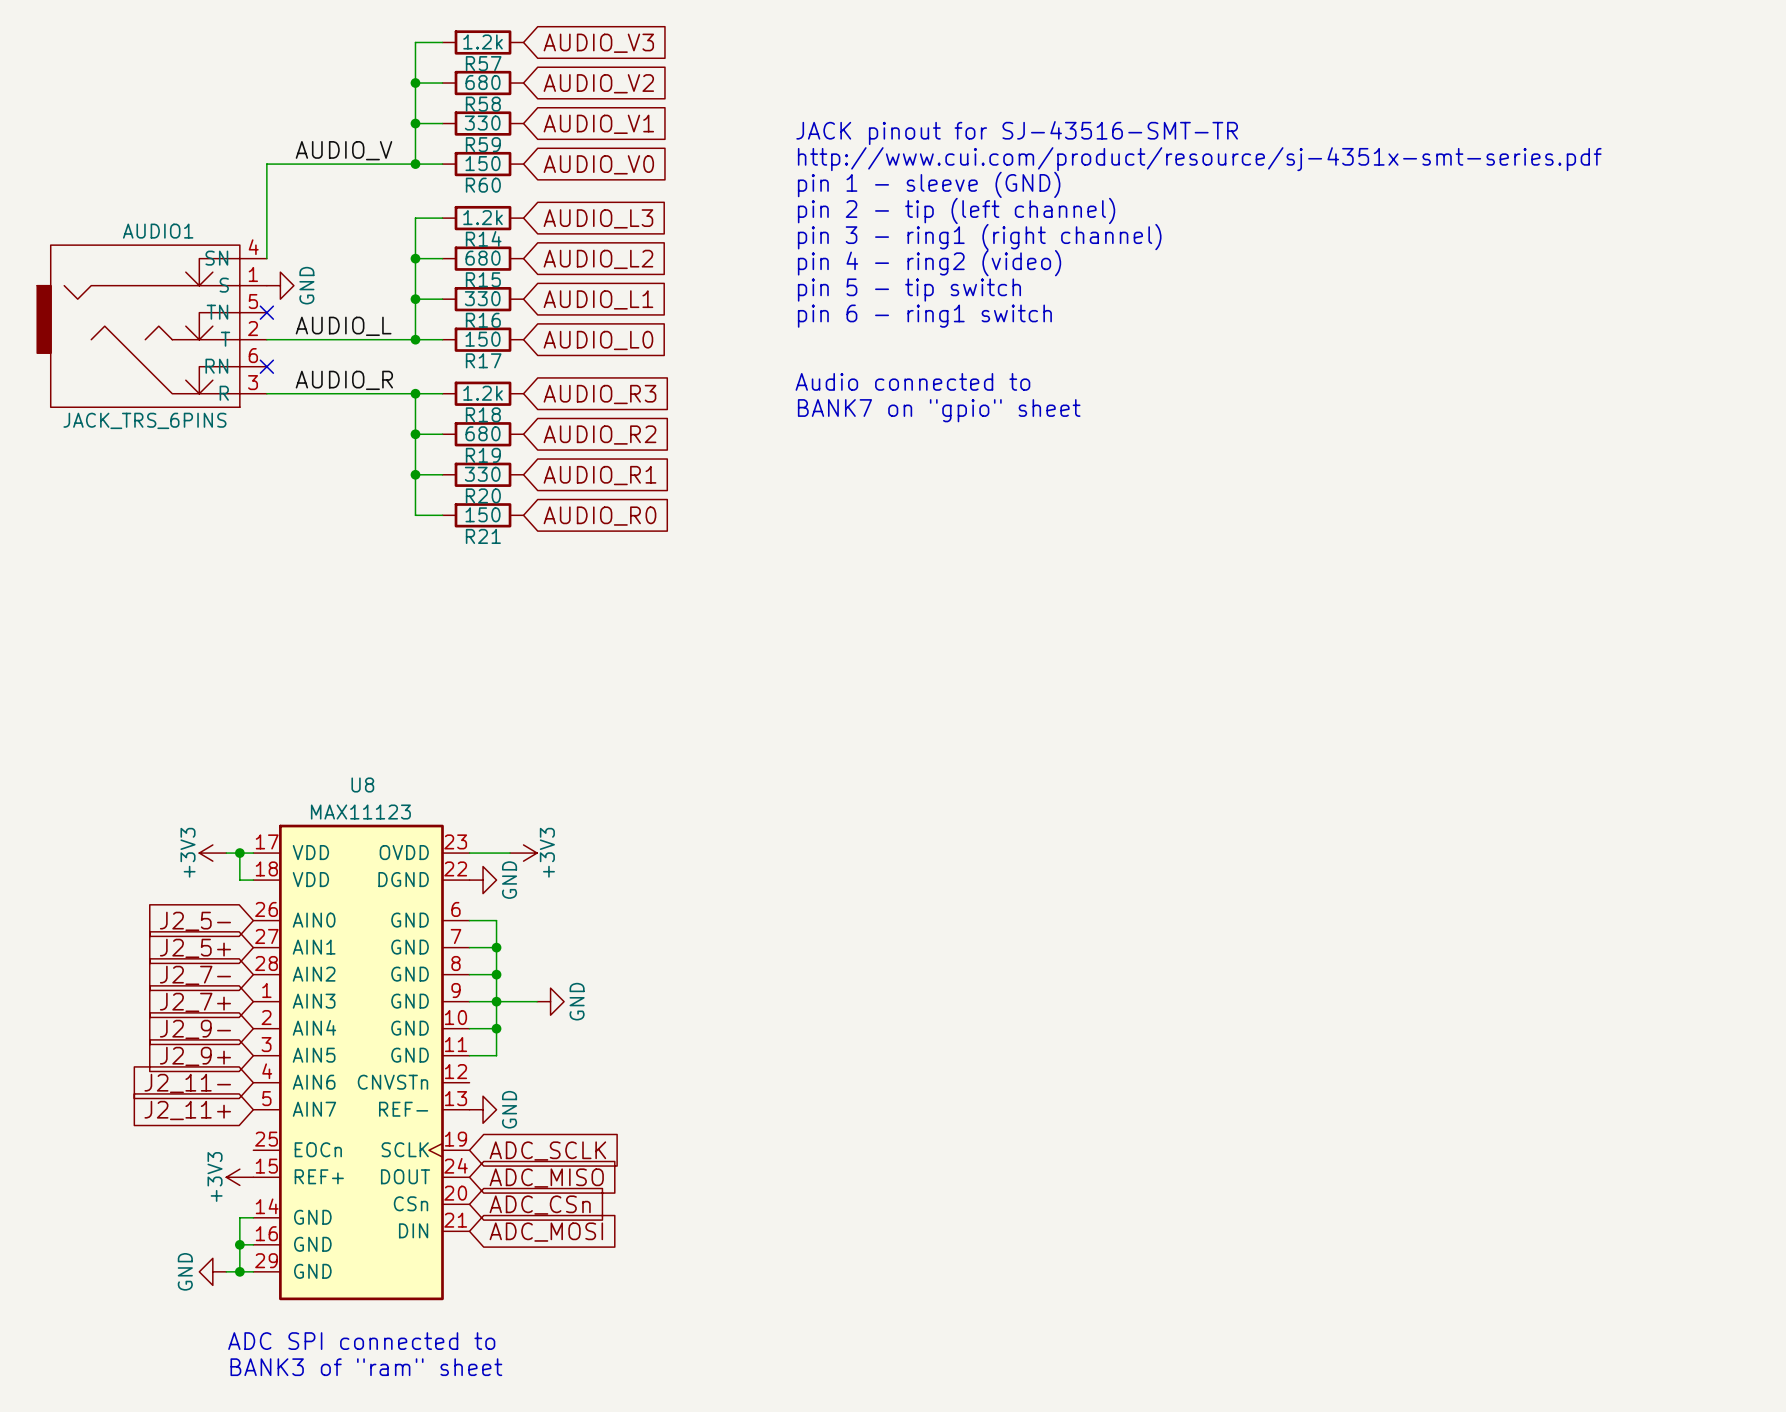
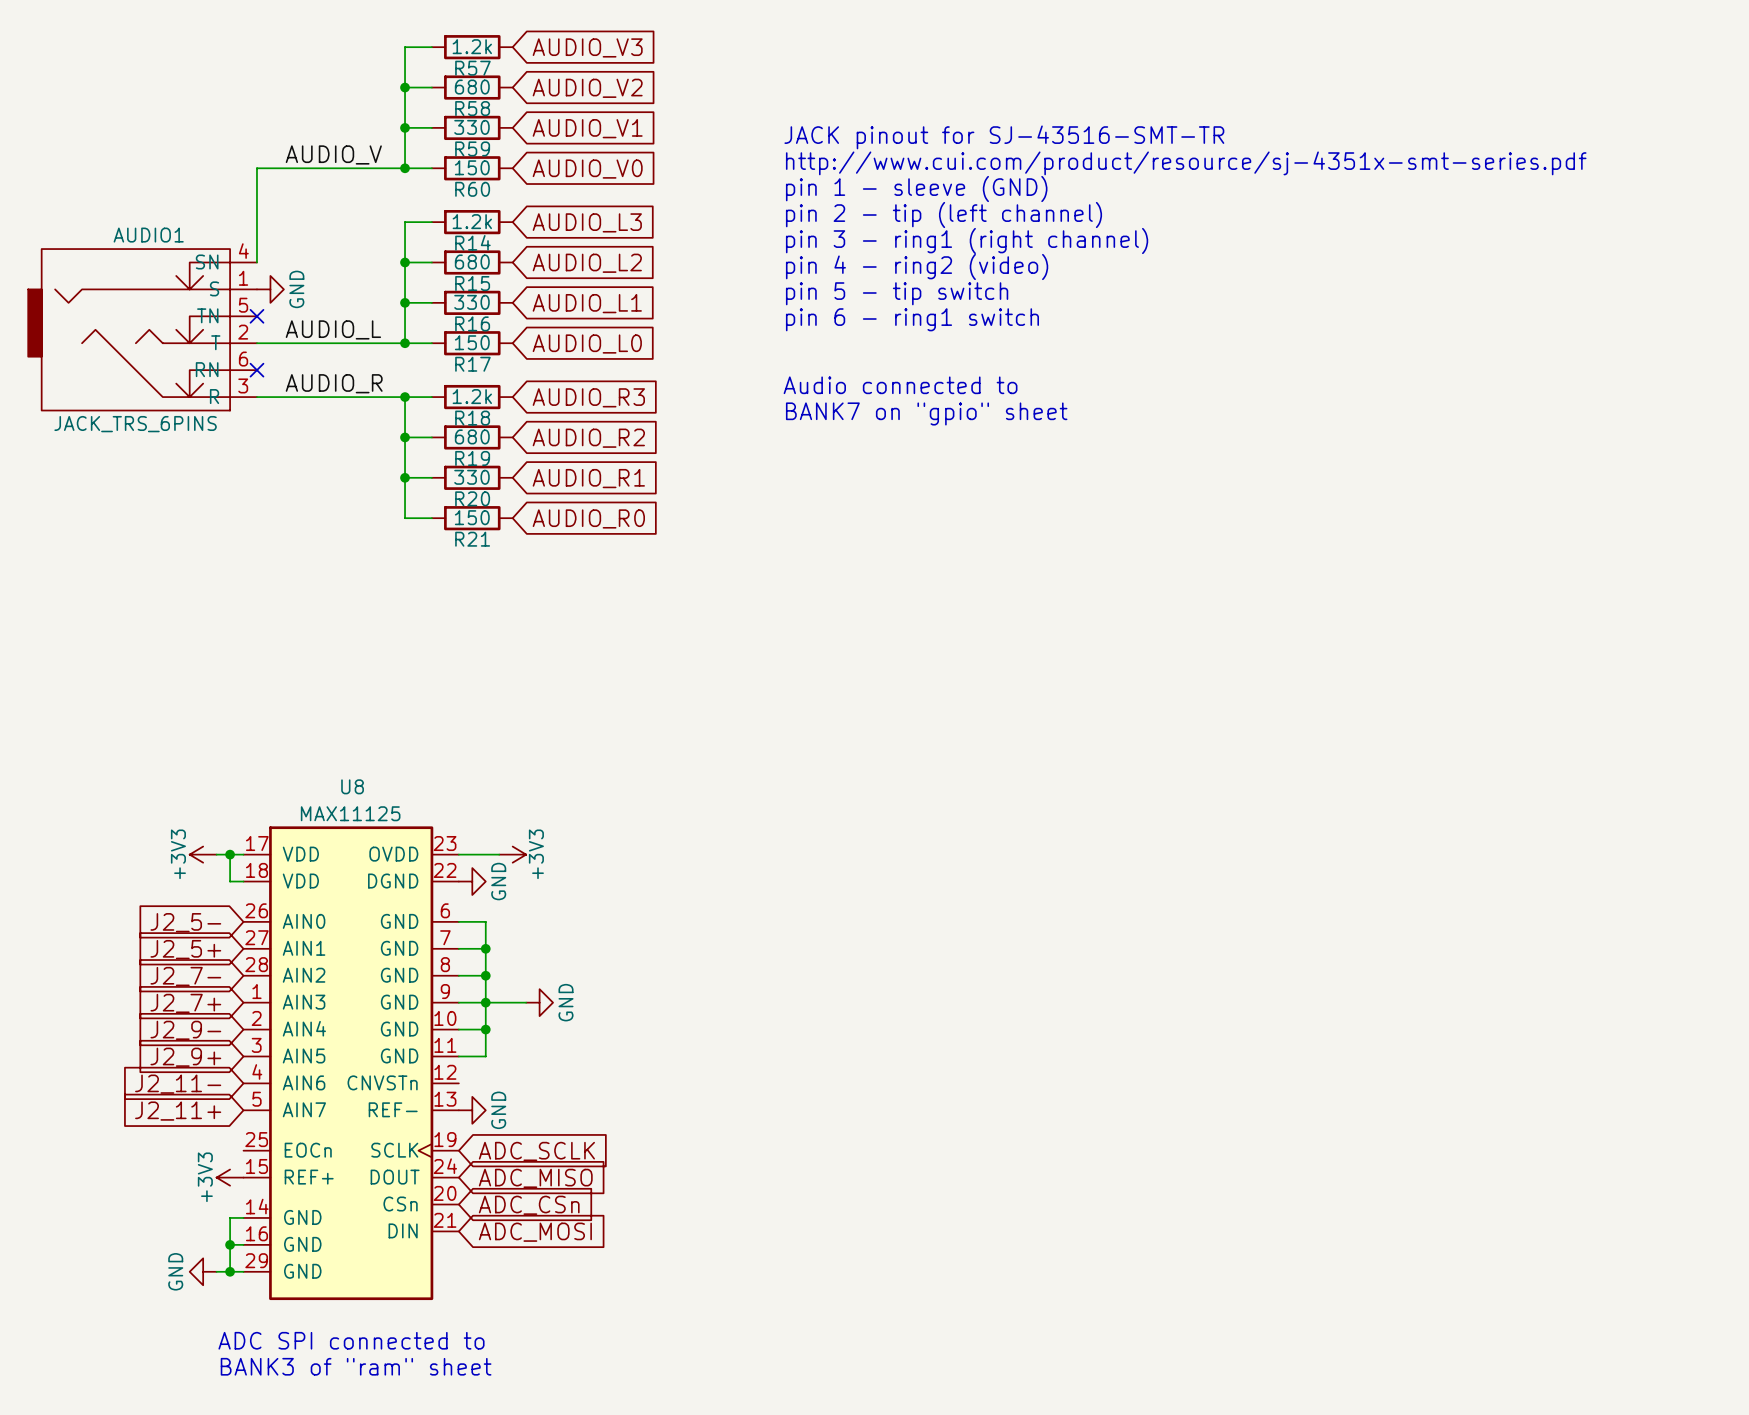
U8 value: MAX11123 (360, 812) -> MAX11125 (350, 813)

